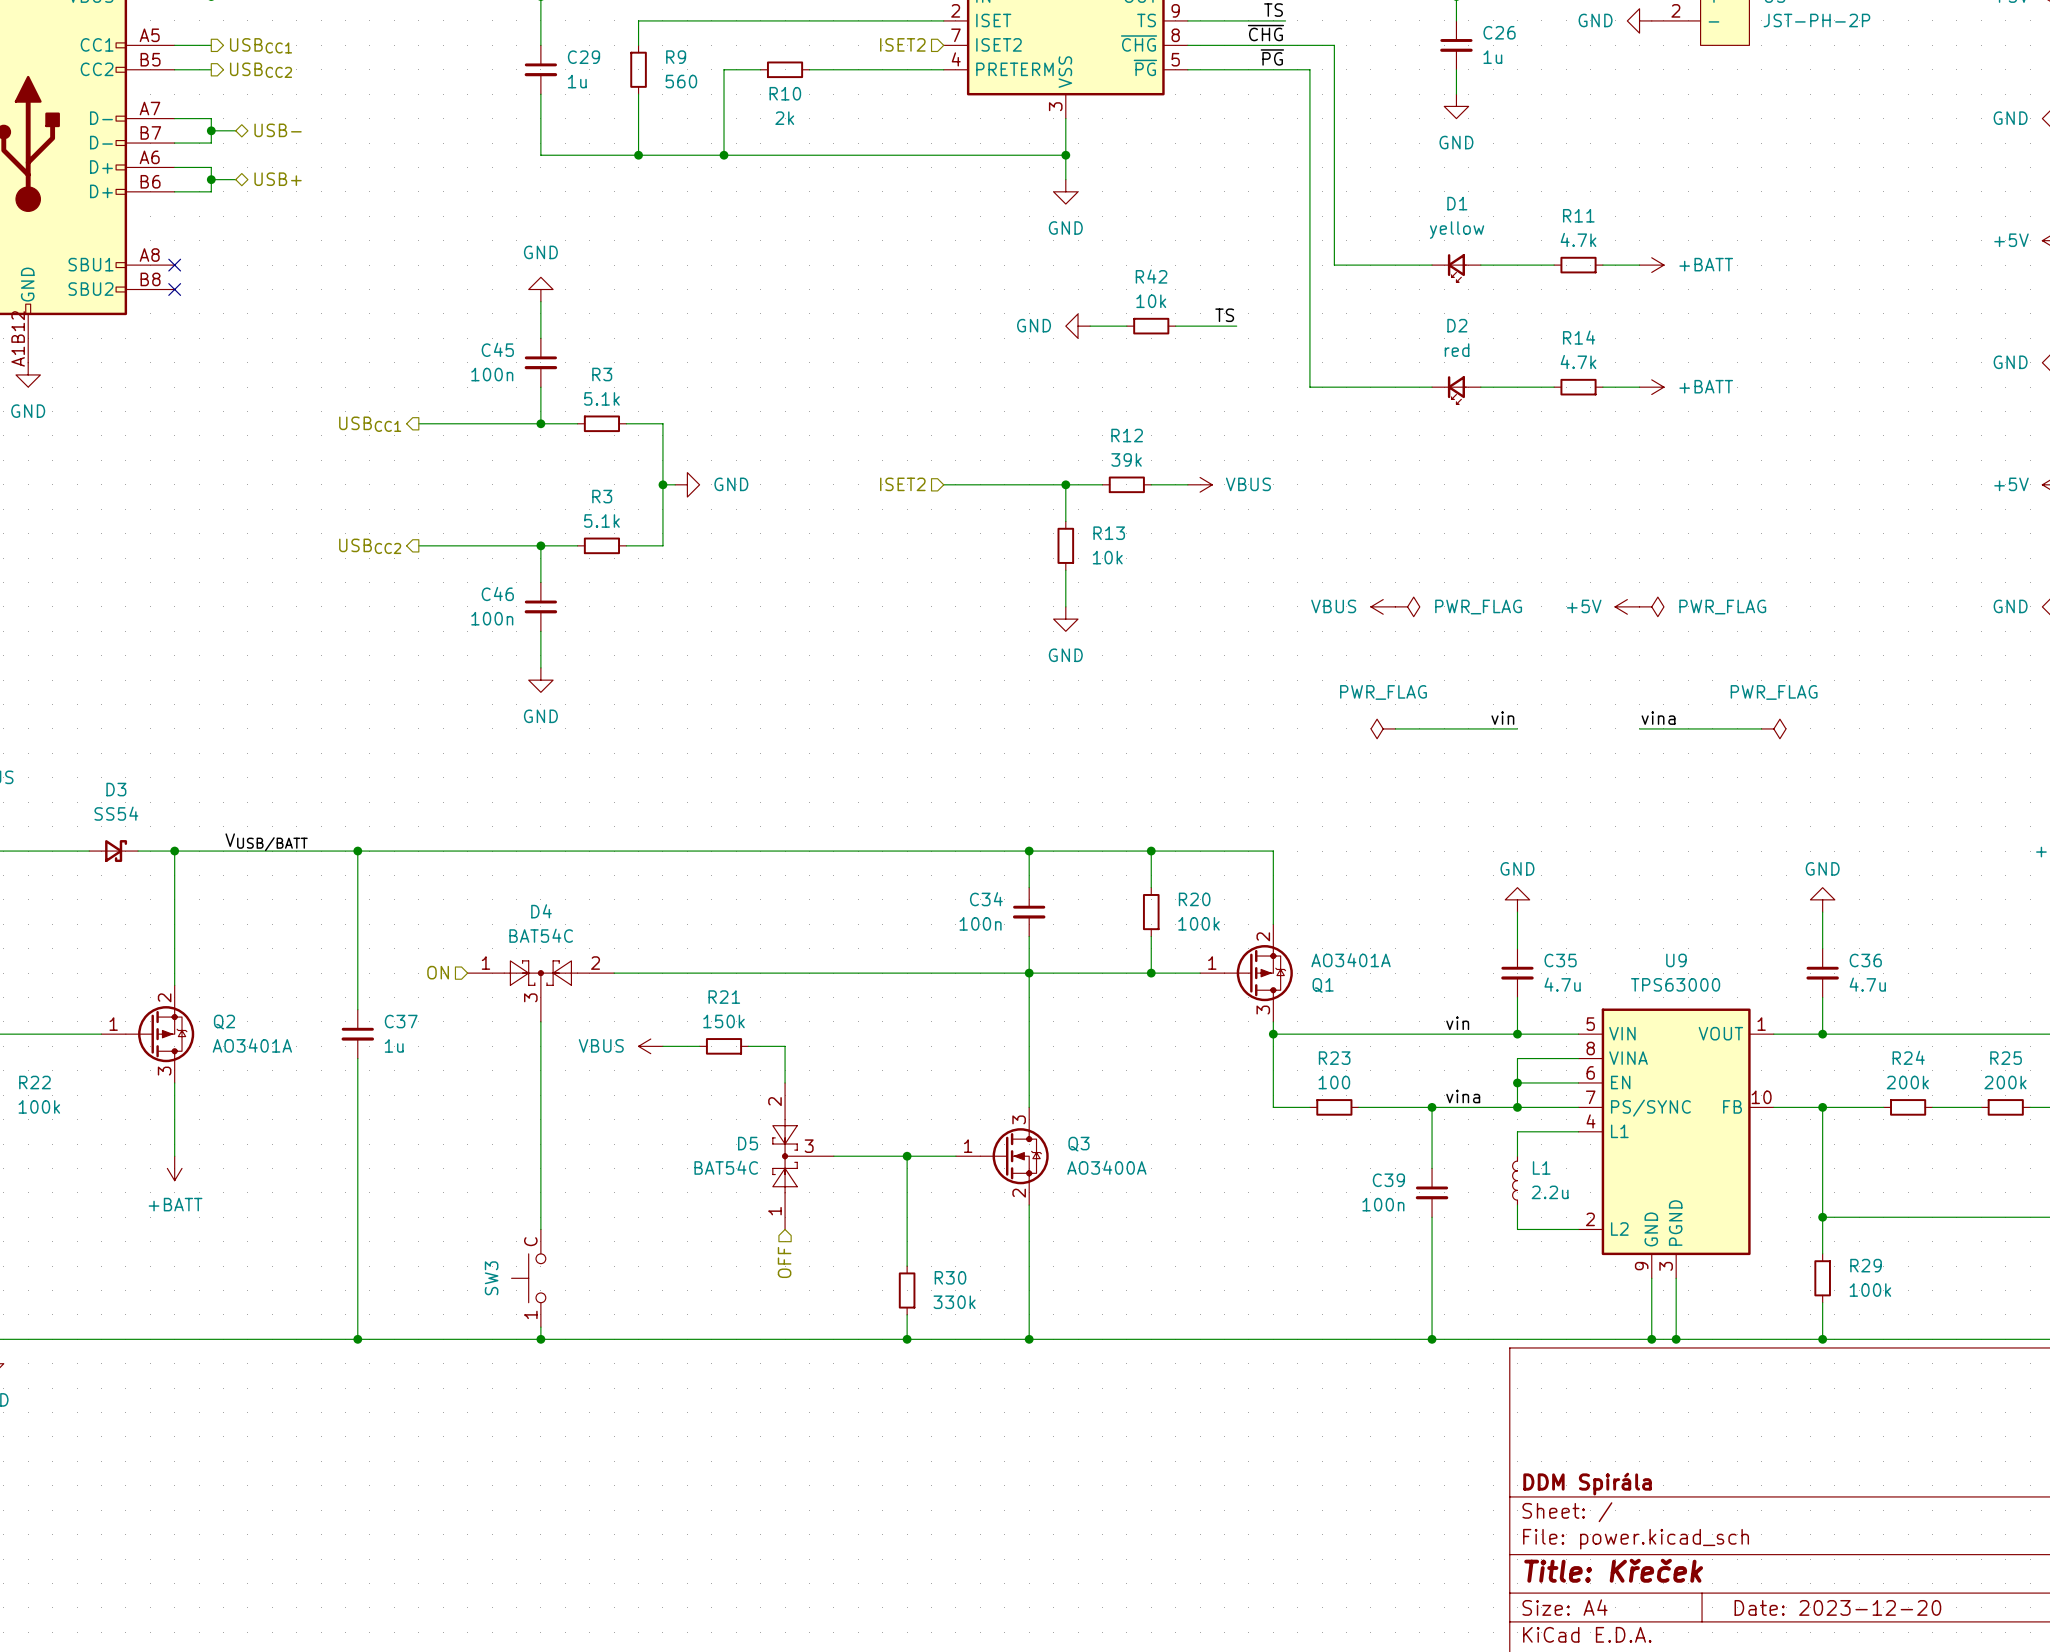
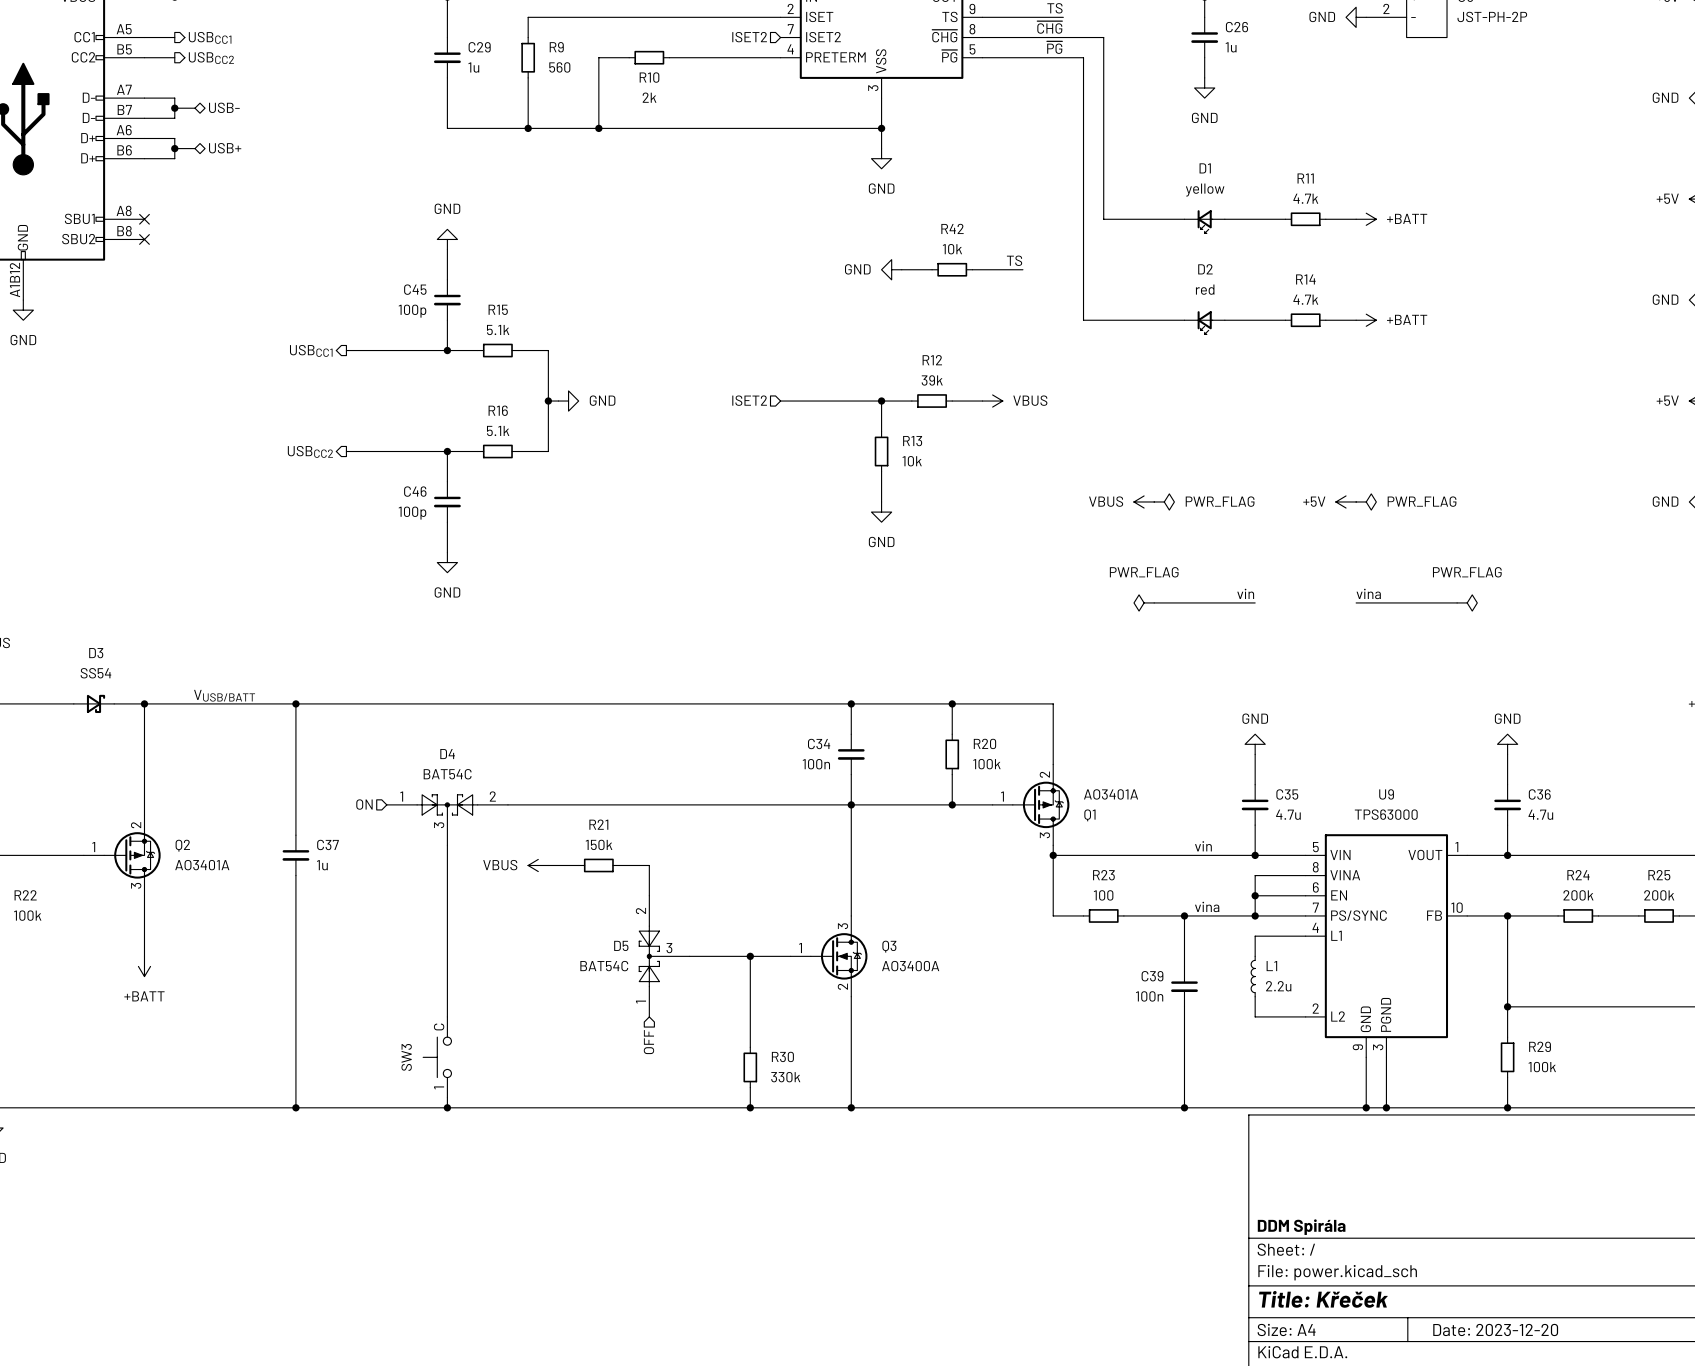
C45 value: 100n (492, 374) -> 100p (412, 311)
R3 name: R3 (602, 374) -> R15 (498, 309)
R3 name: R3 (602, 496) -> R16 (498, 410)
C46 value: 100n (492, 618) -> 100p (412, 513)

